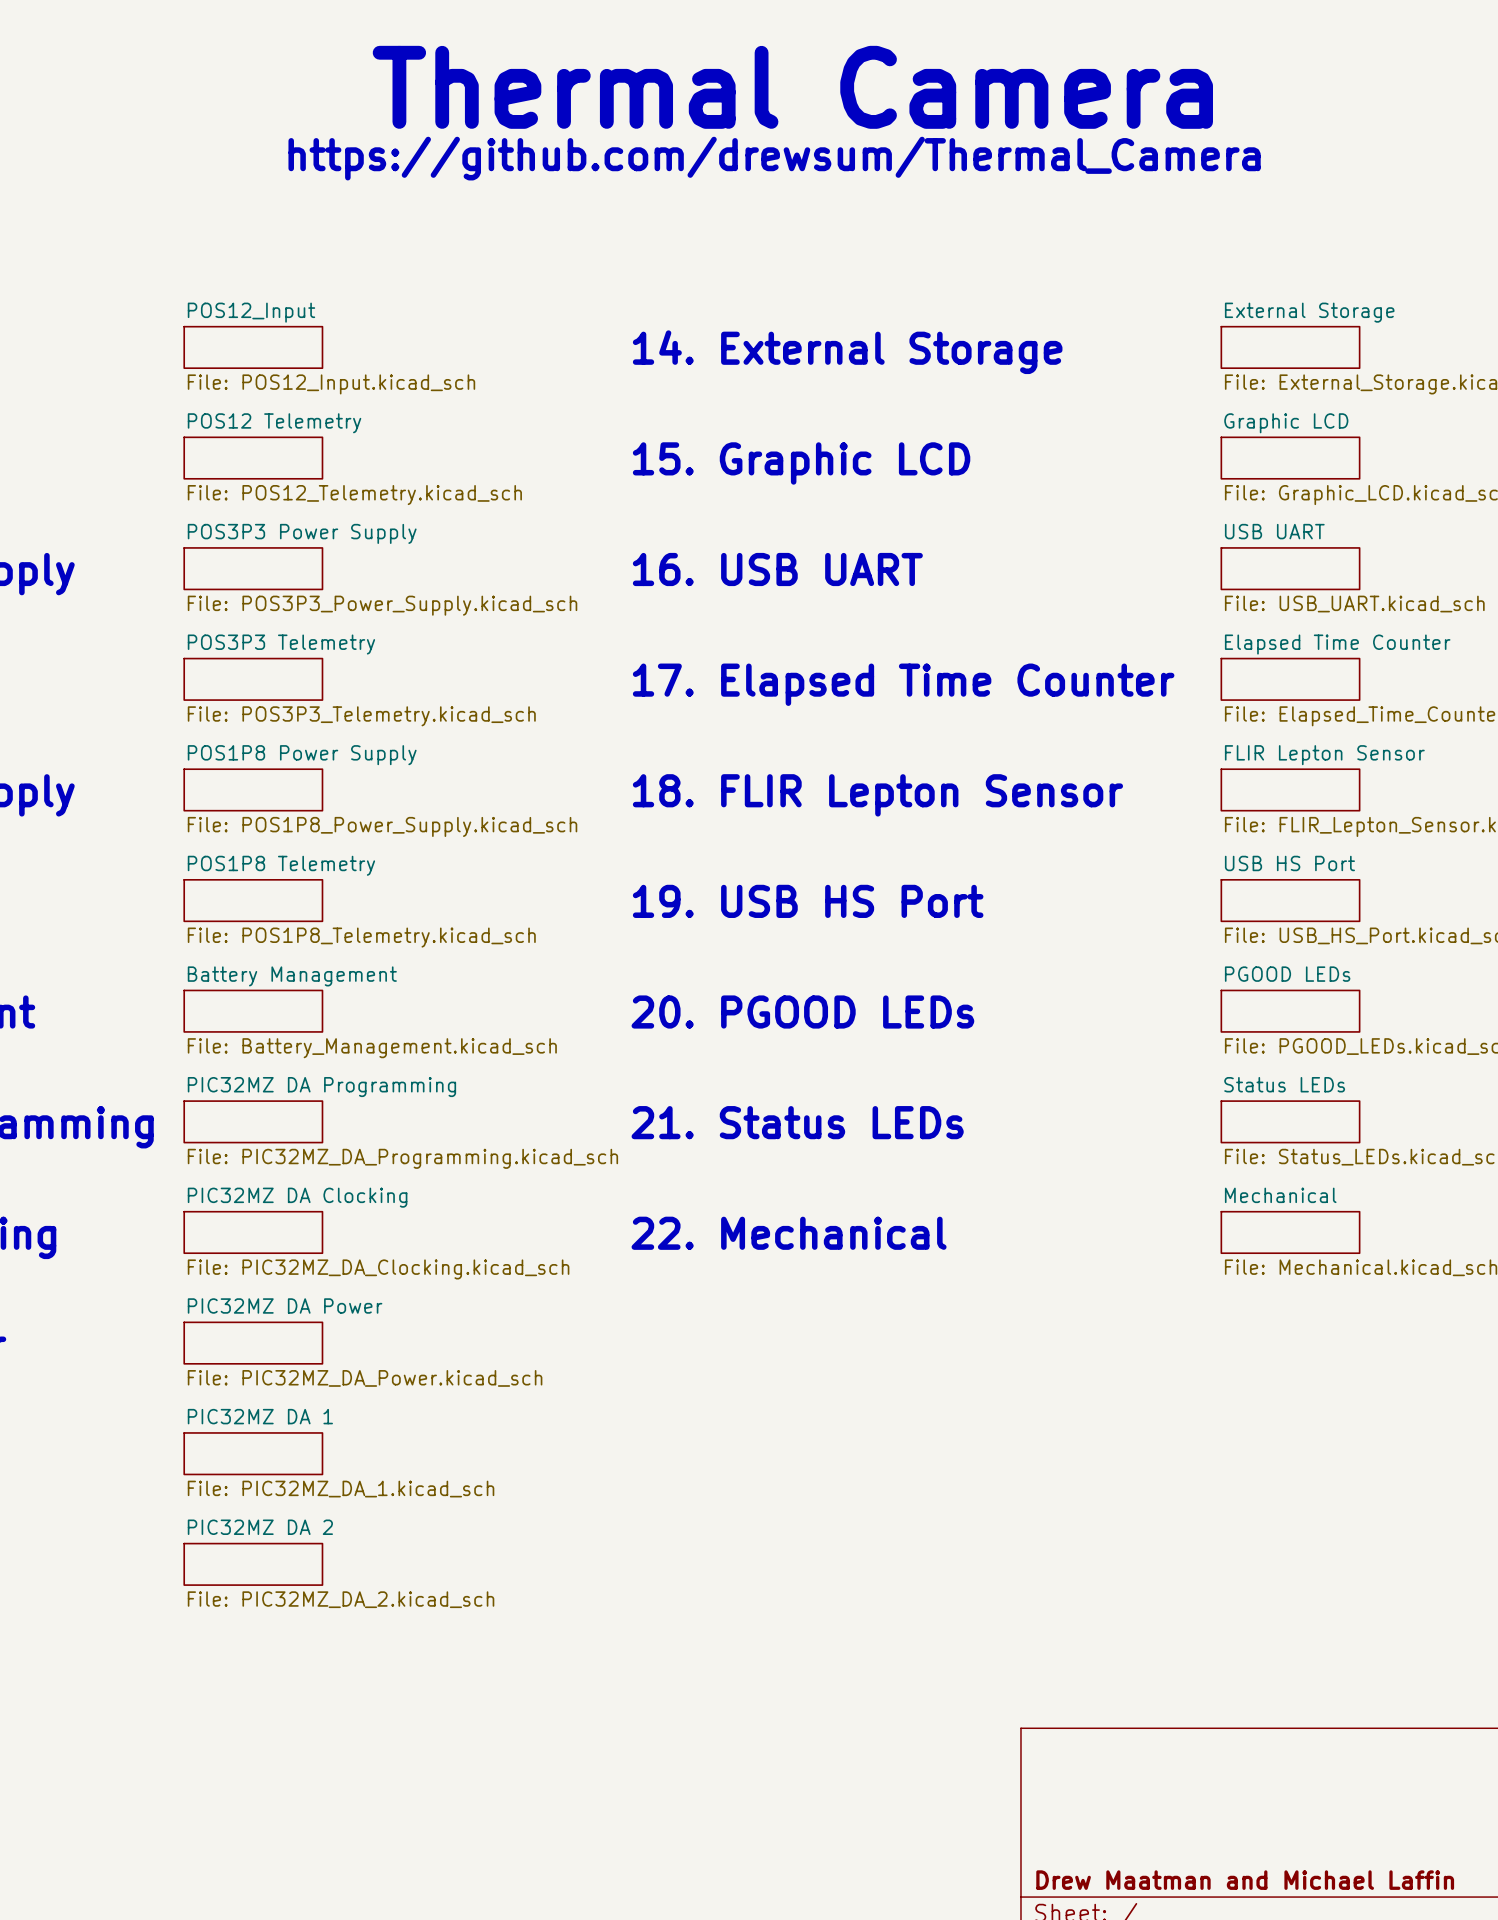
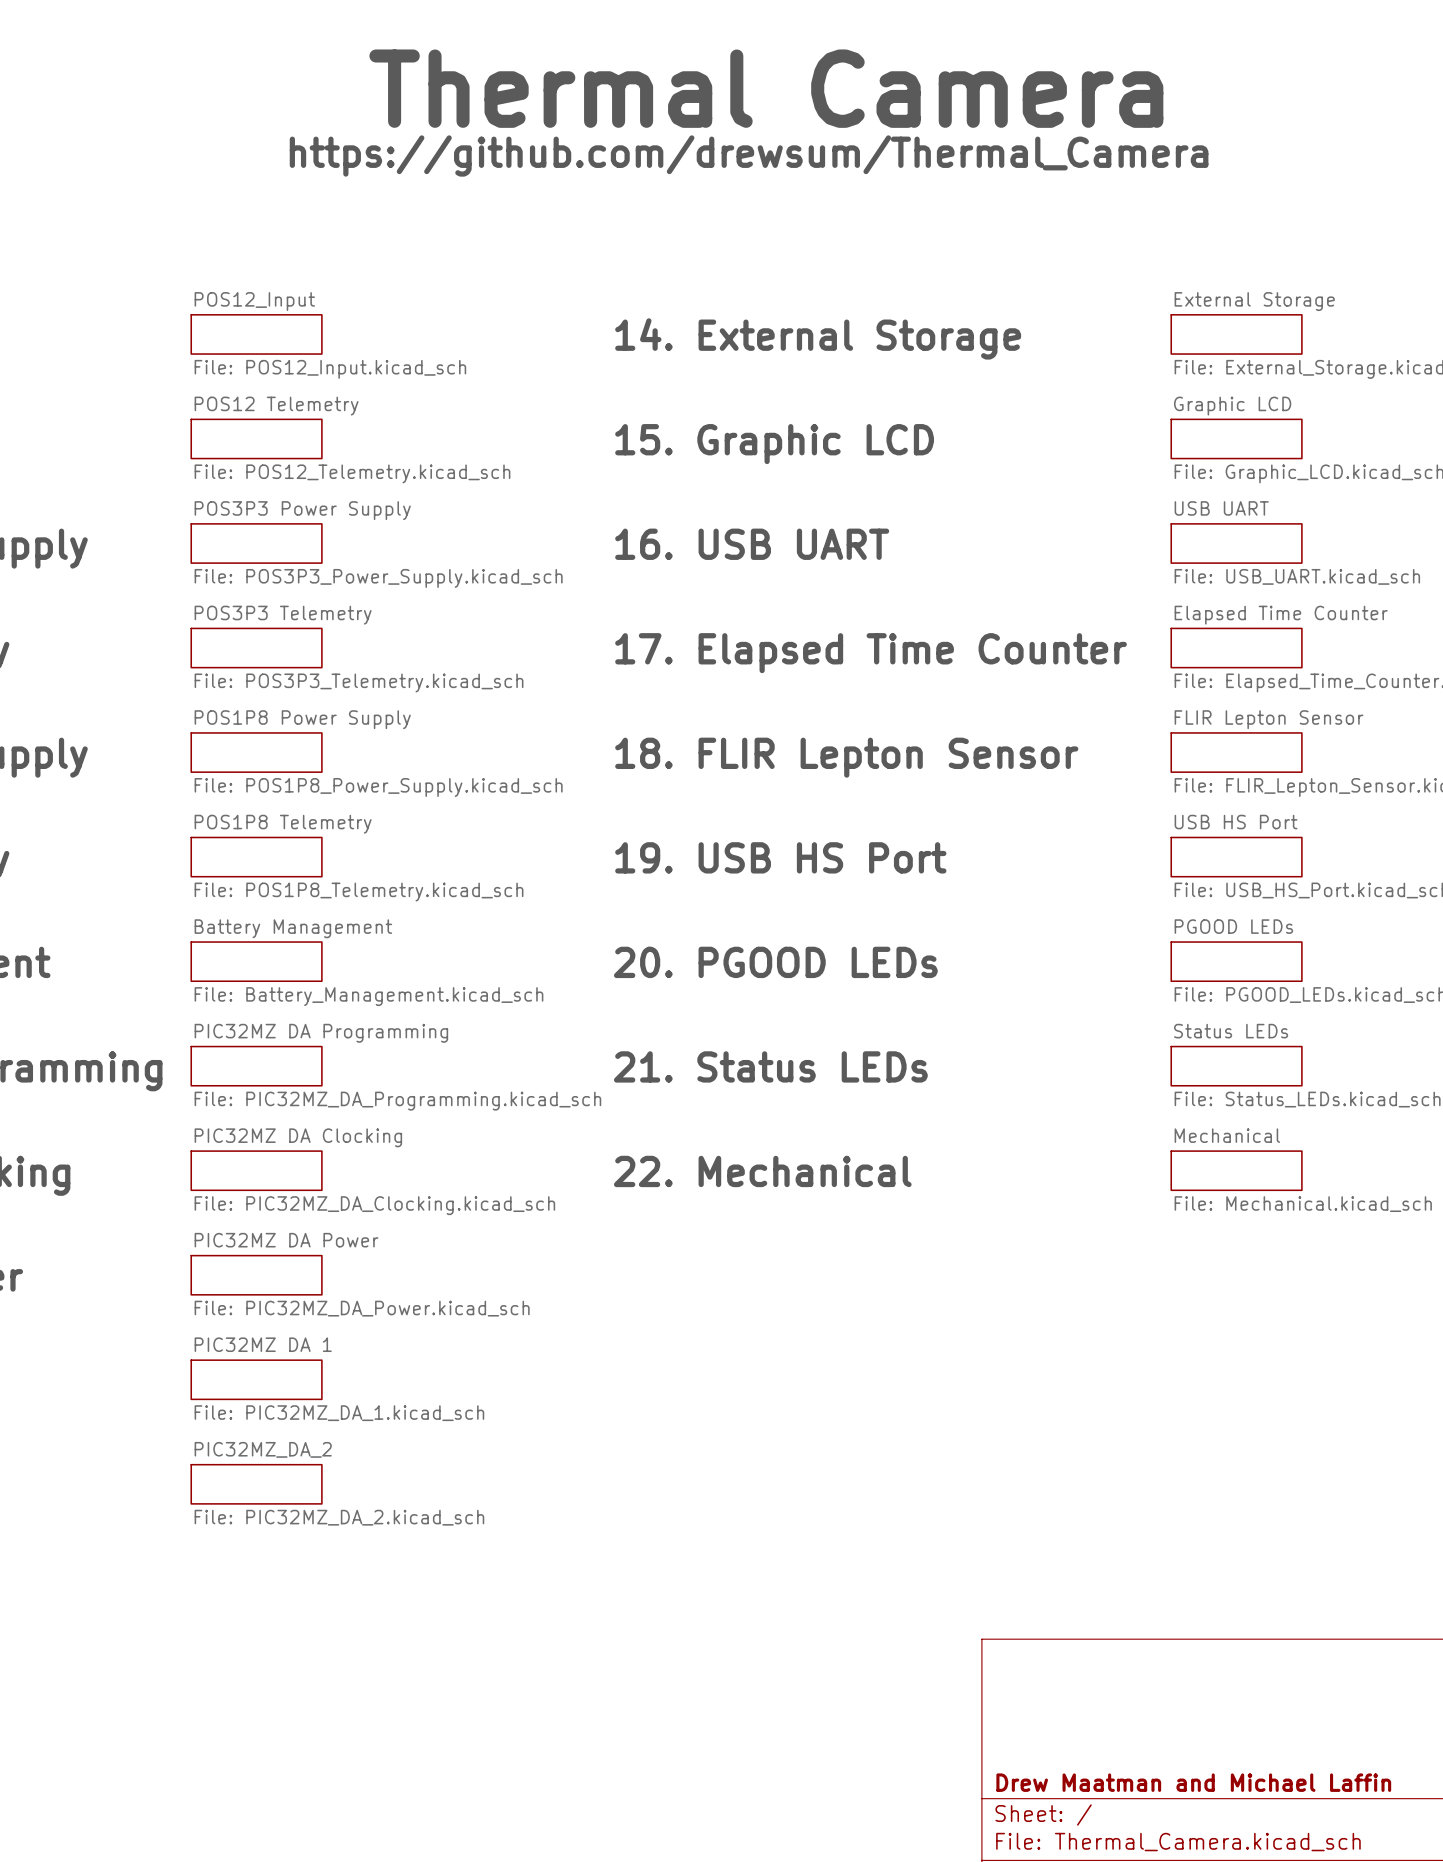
sheet PIC32MZ DA 2 name: PIC32MZ DA 2 (260, 1527) -> PIC32MZ_DA_2 (263, 1449)

